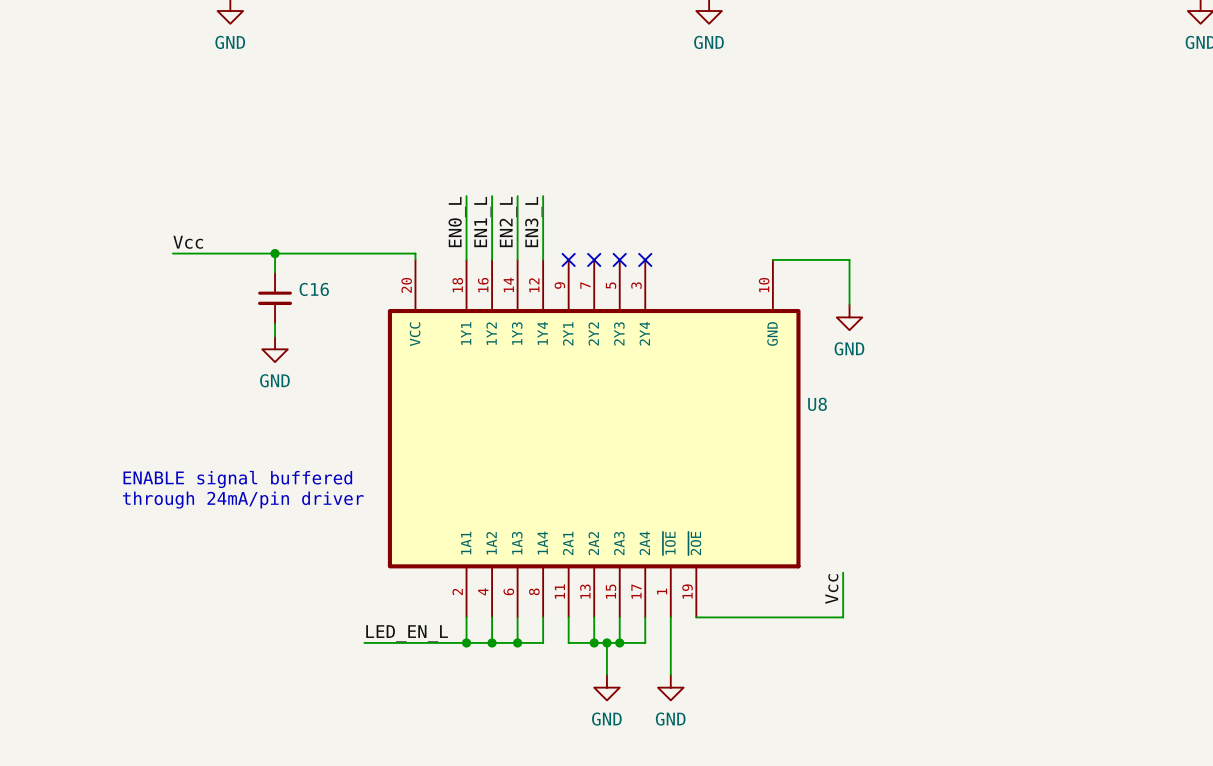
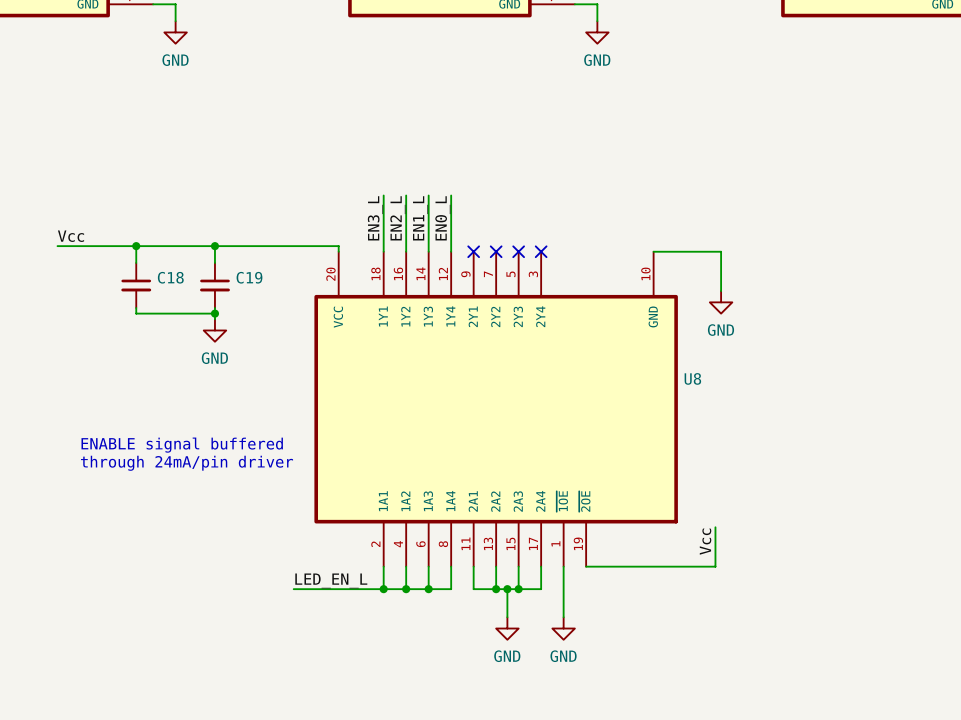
label: EN0_L (457, 222) -> EN3_L (375, 218)
label: EN1_L (482, 222) -> EN2_L (397, 218)
label: EN2_L (508, 222) -> EN1_L (420, 218)
label: EN3_L (533, 222) -> EN0_L (442, 218)
label position: Vcc (188, 242) -> Vcc (71, 236)
wire: none -> (57, 246) (125, 246)
wire: none -> (136, 246) (136, 262)
junction: none -> (136, 246)
C16 name: C16 (314, 289) -> C19 (249, 277)
C18: none -> (136, 285)
wire: none -> (136, 307) (136, 313) (214, 313)
junction: none -> (214, 313)

